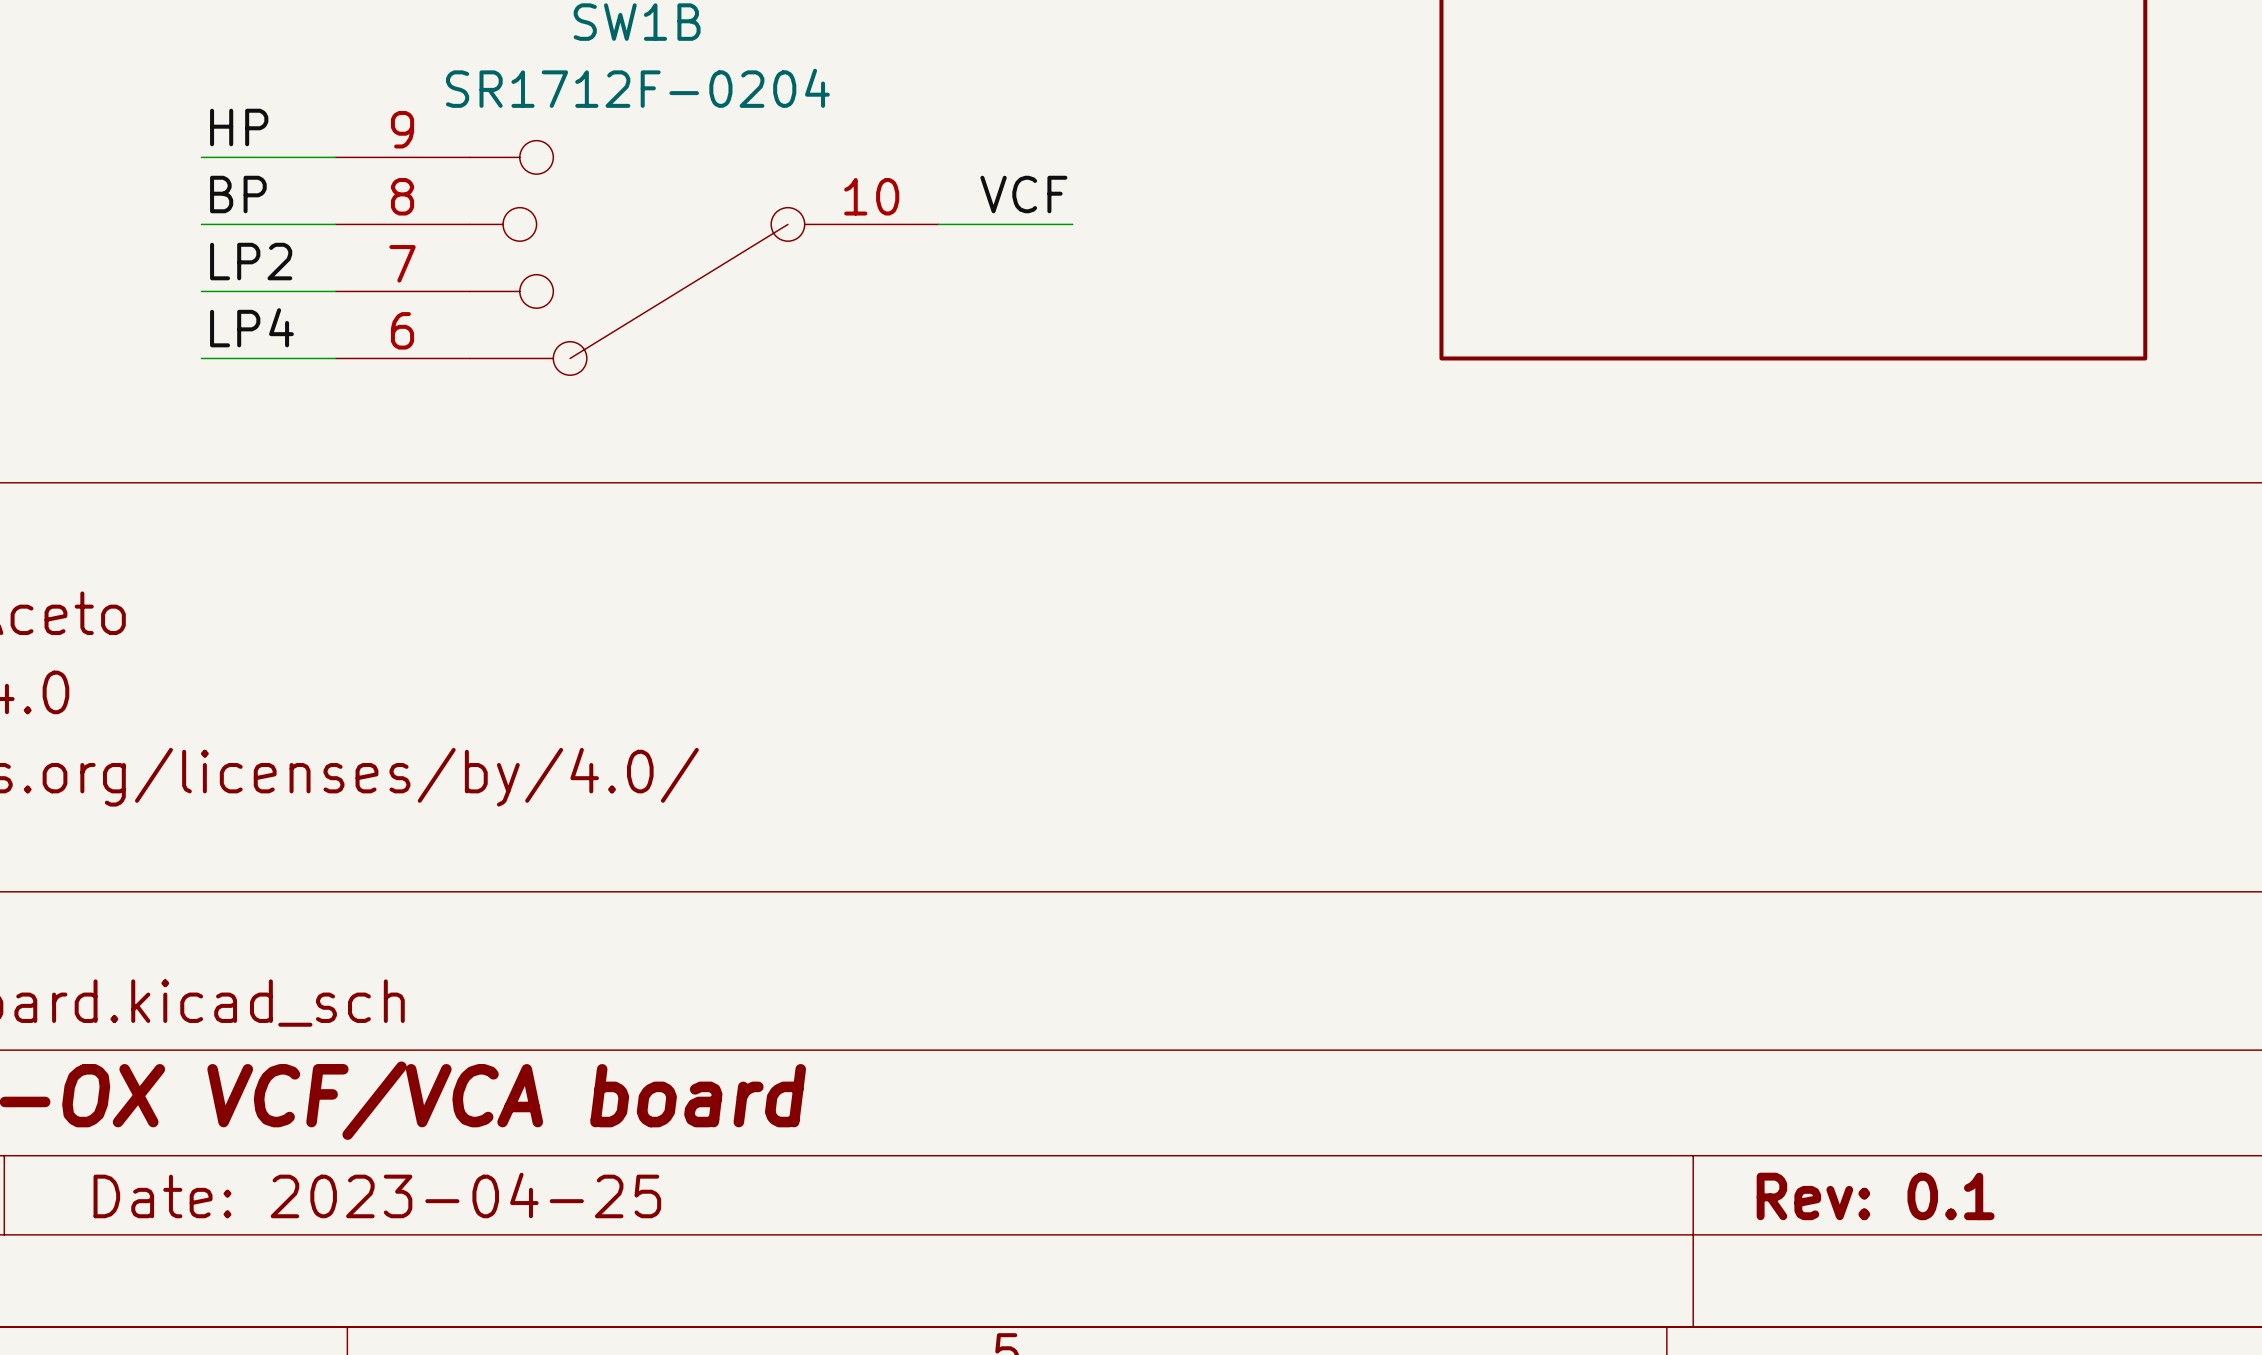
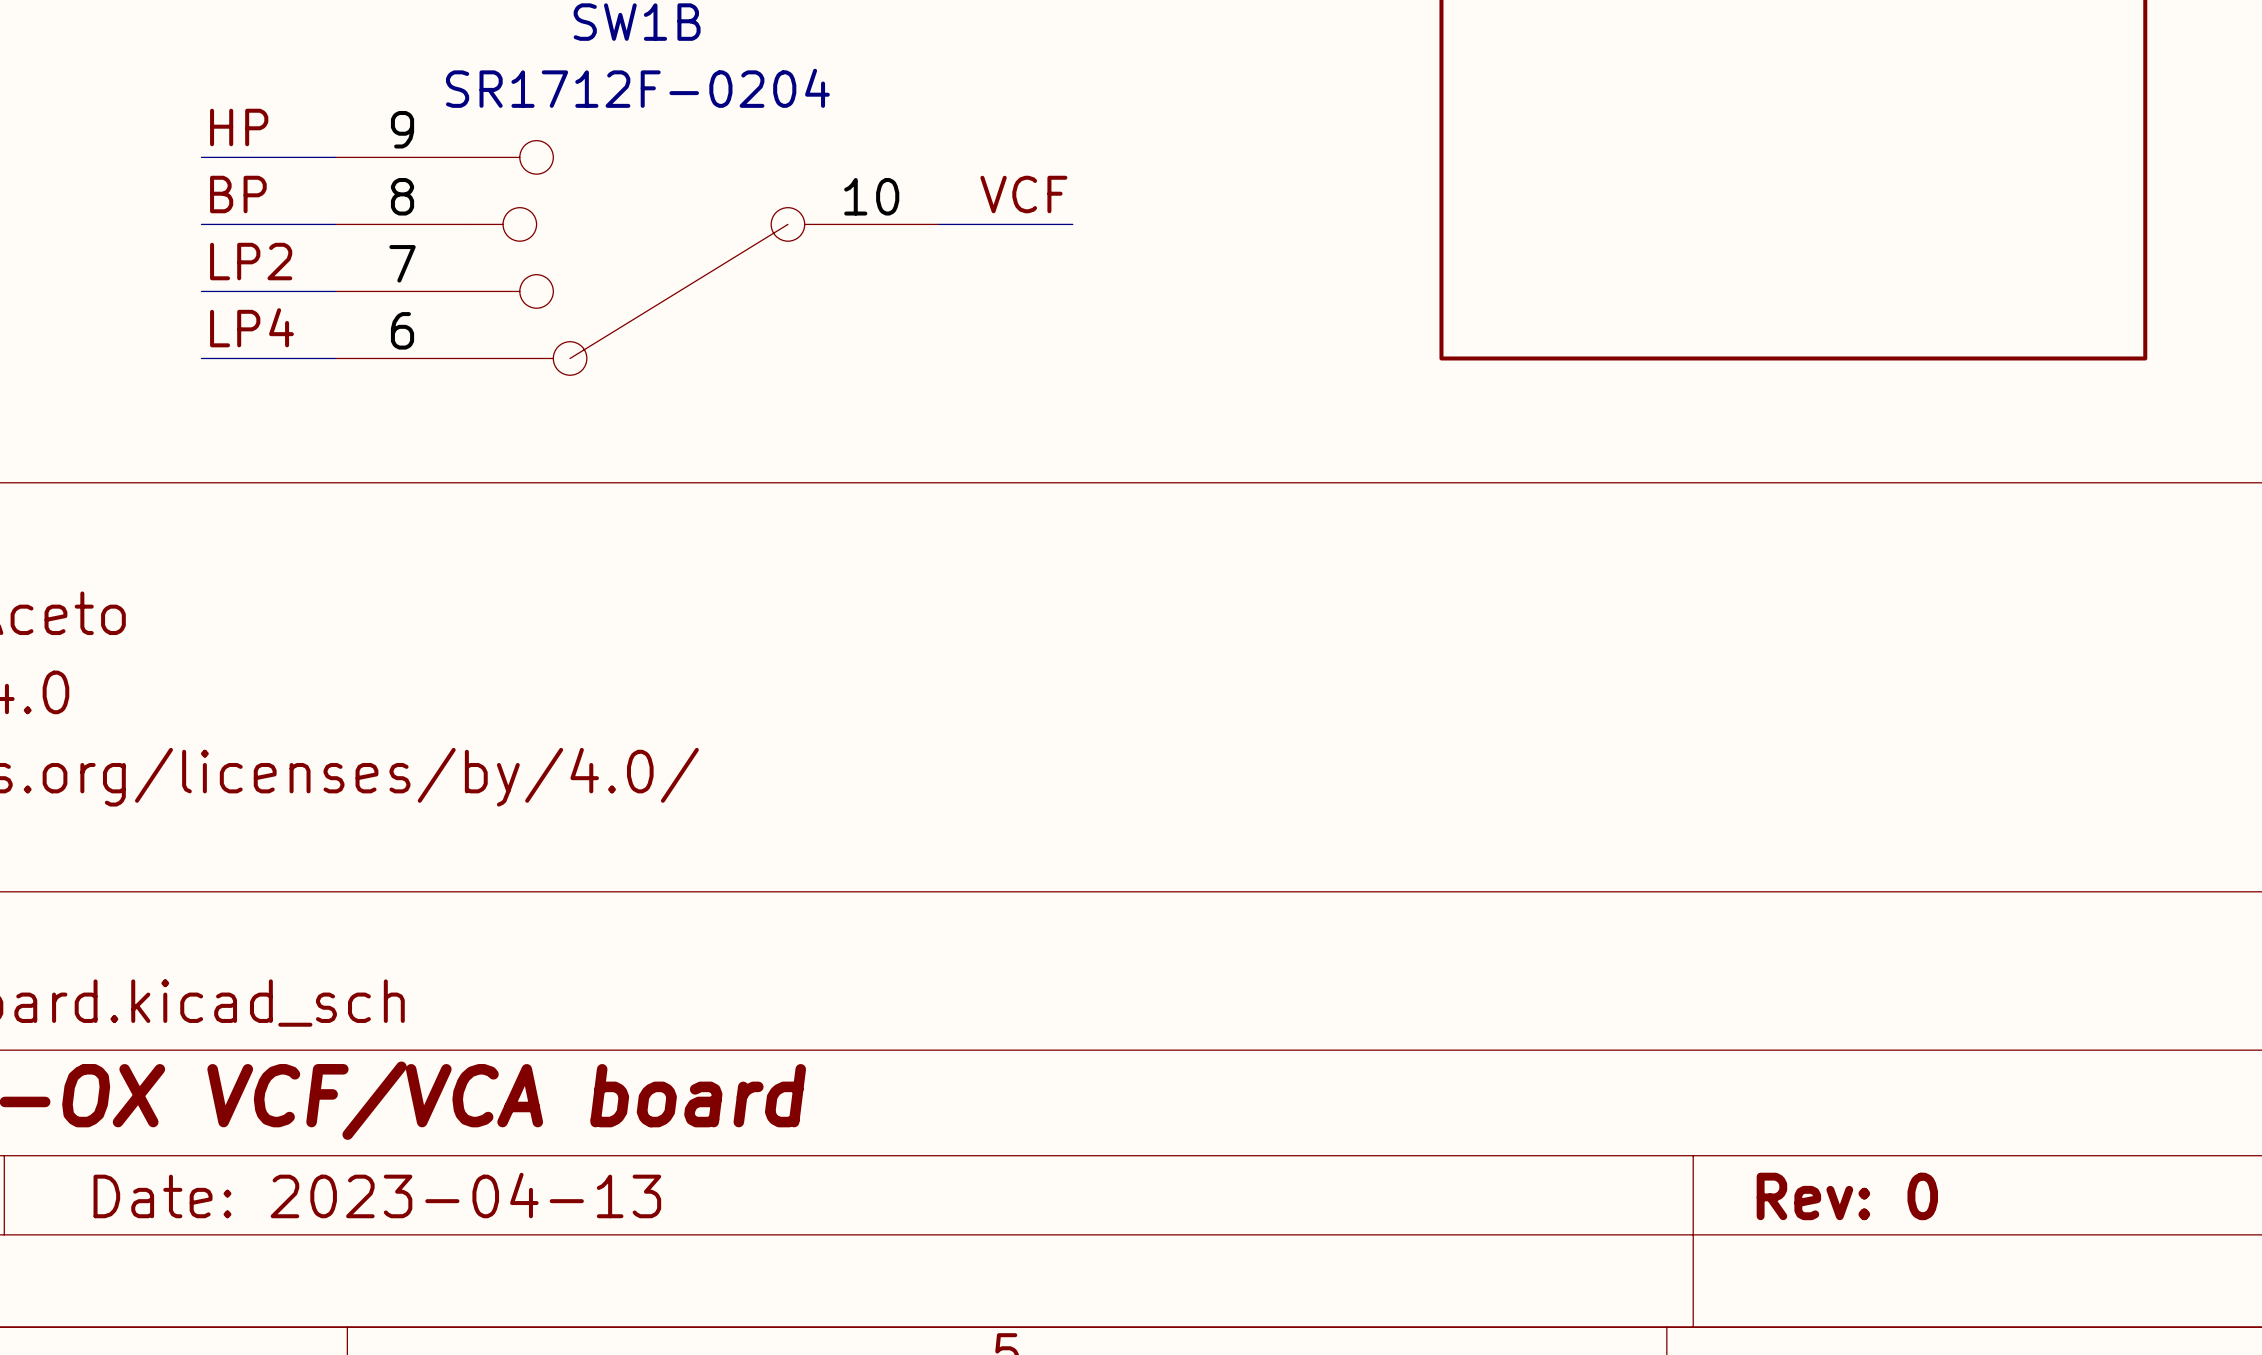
title block: Date: 2023-04-25 (377, 1195) -> Date: 2023-04-13 (377, 1195)
title block: Rev: 0.1 (1875, 1196) -> Rev: 0 (1847, 1196)

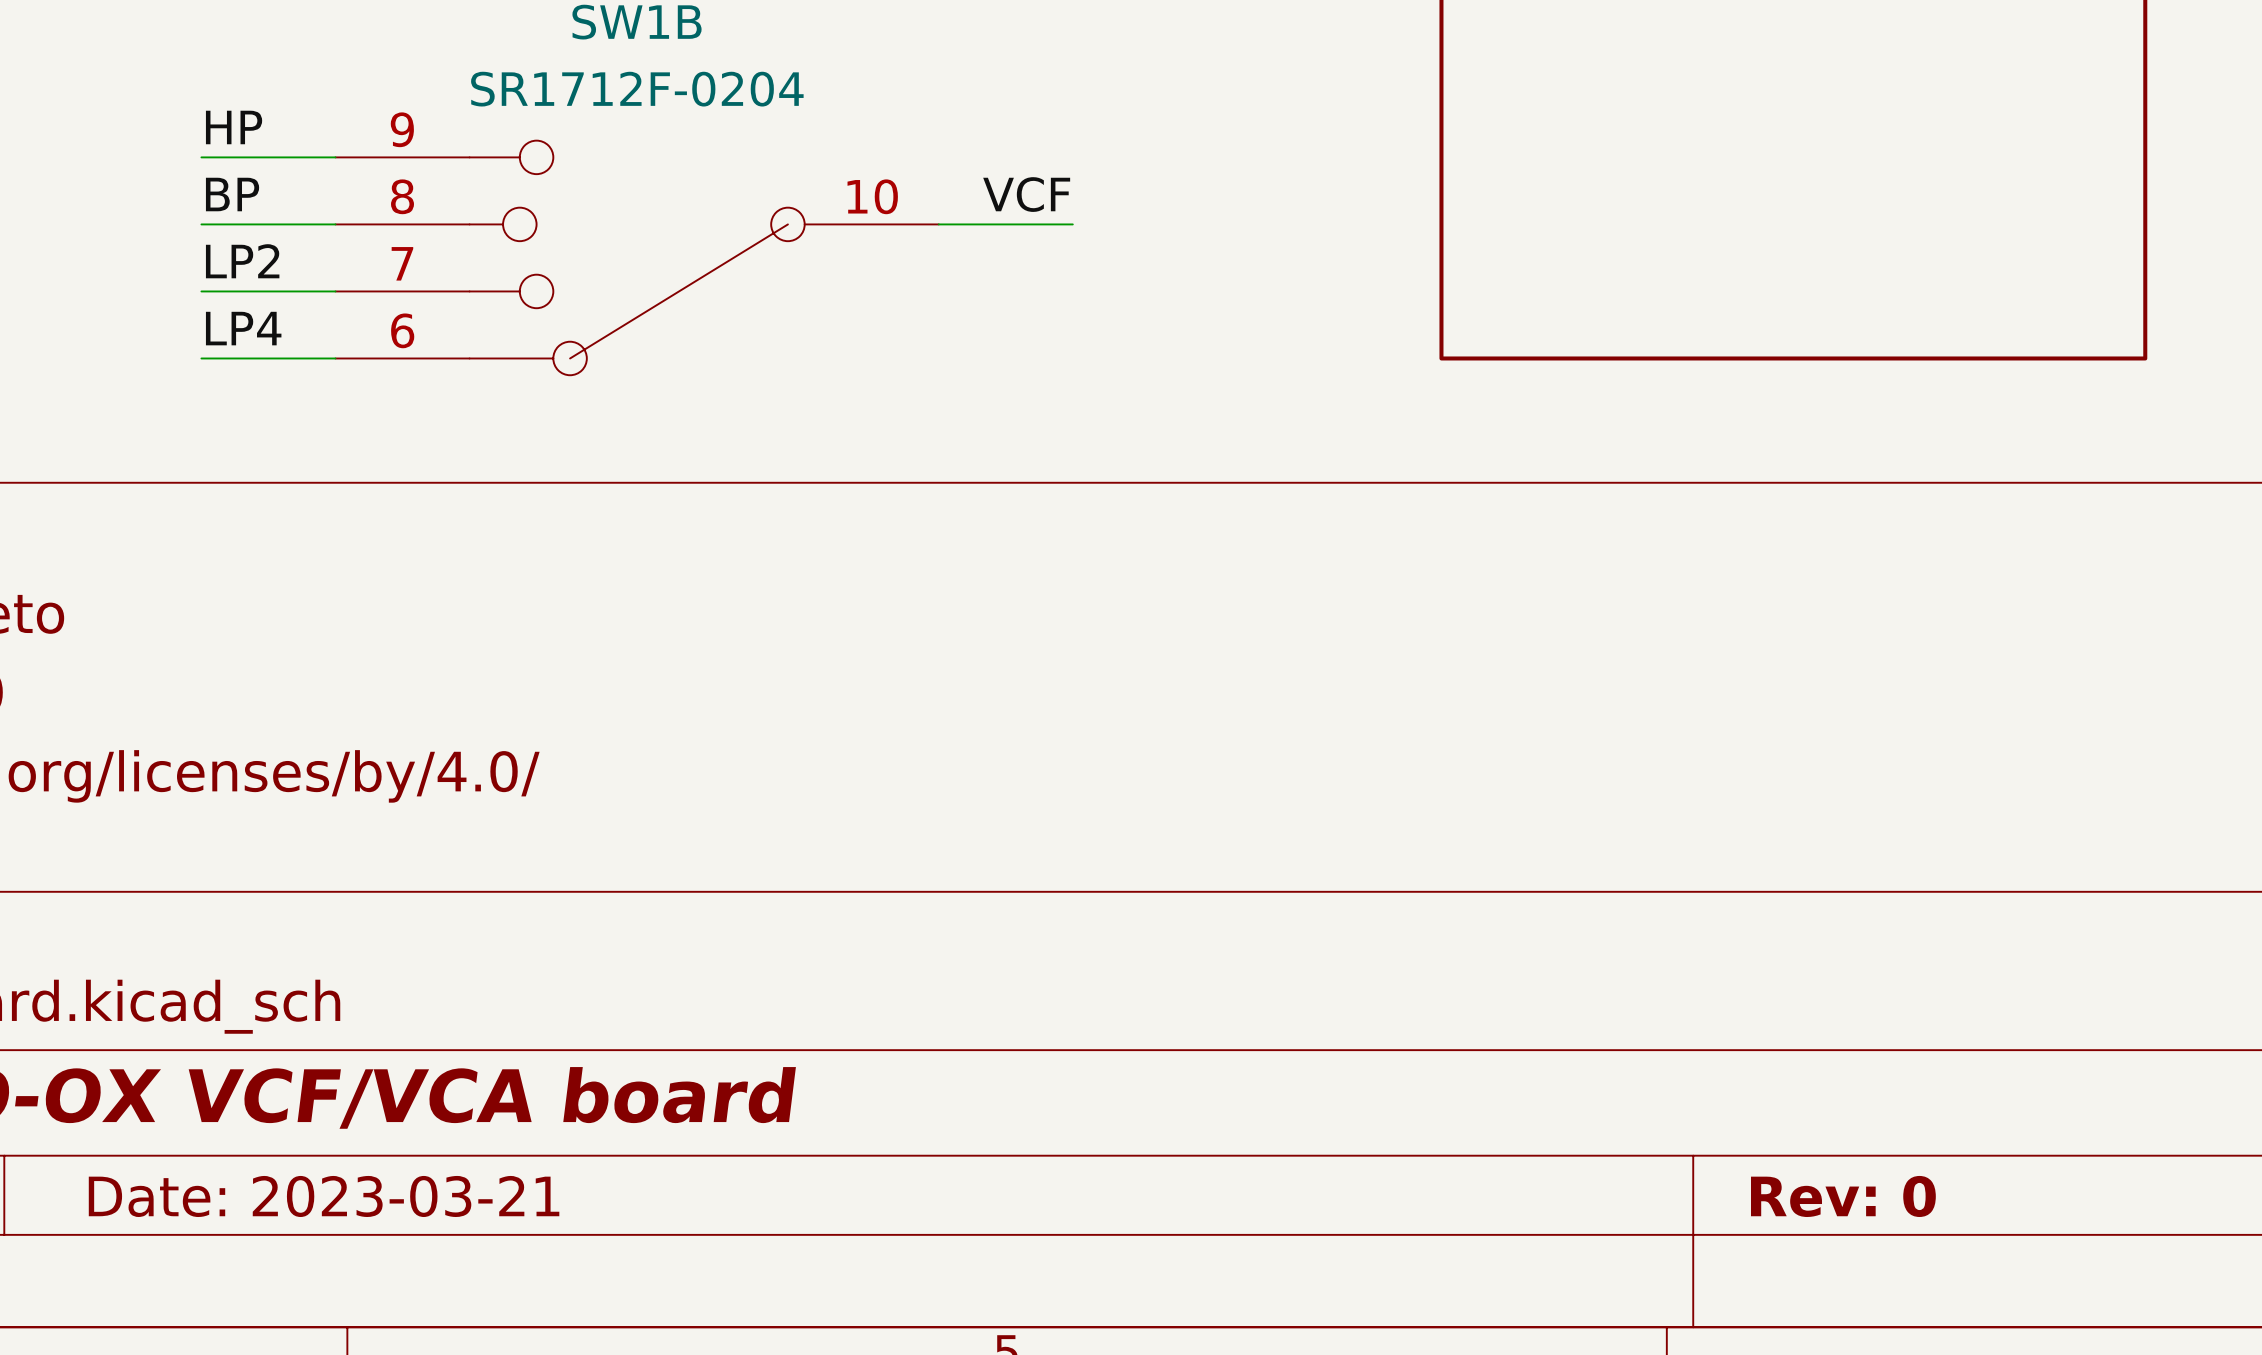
title block: Date: 2023-04-13 (377, 1195) -> Date: 2023-03-21 (324, 1196)

